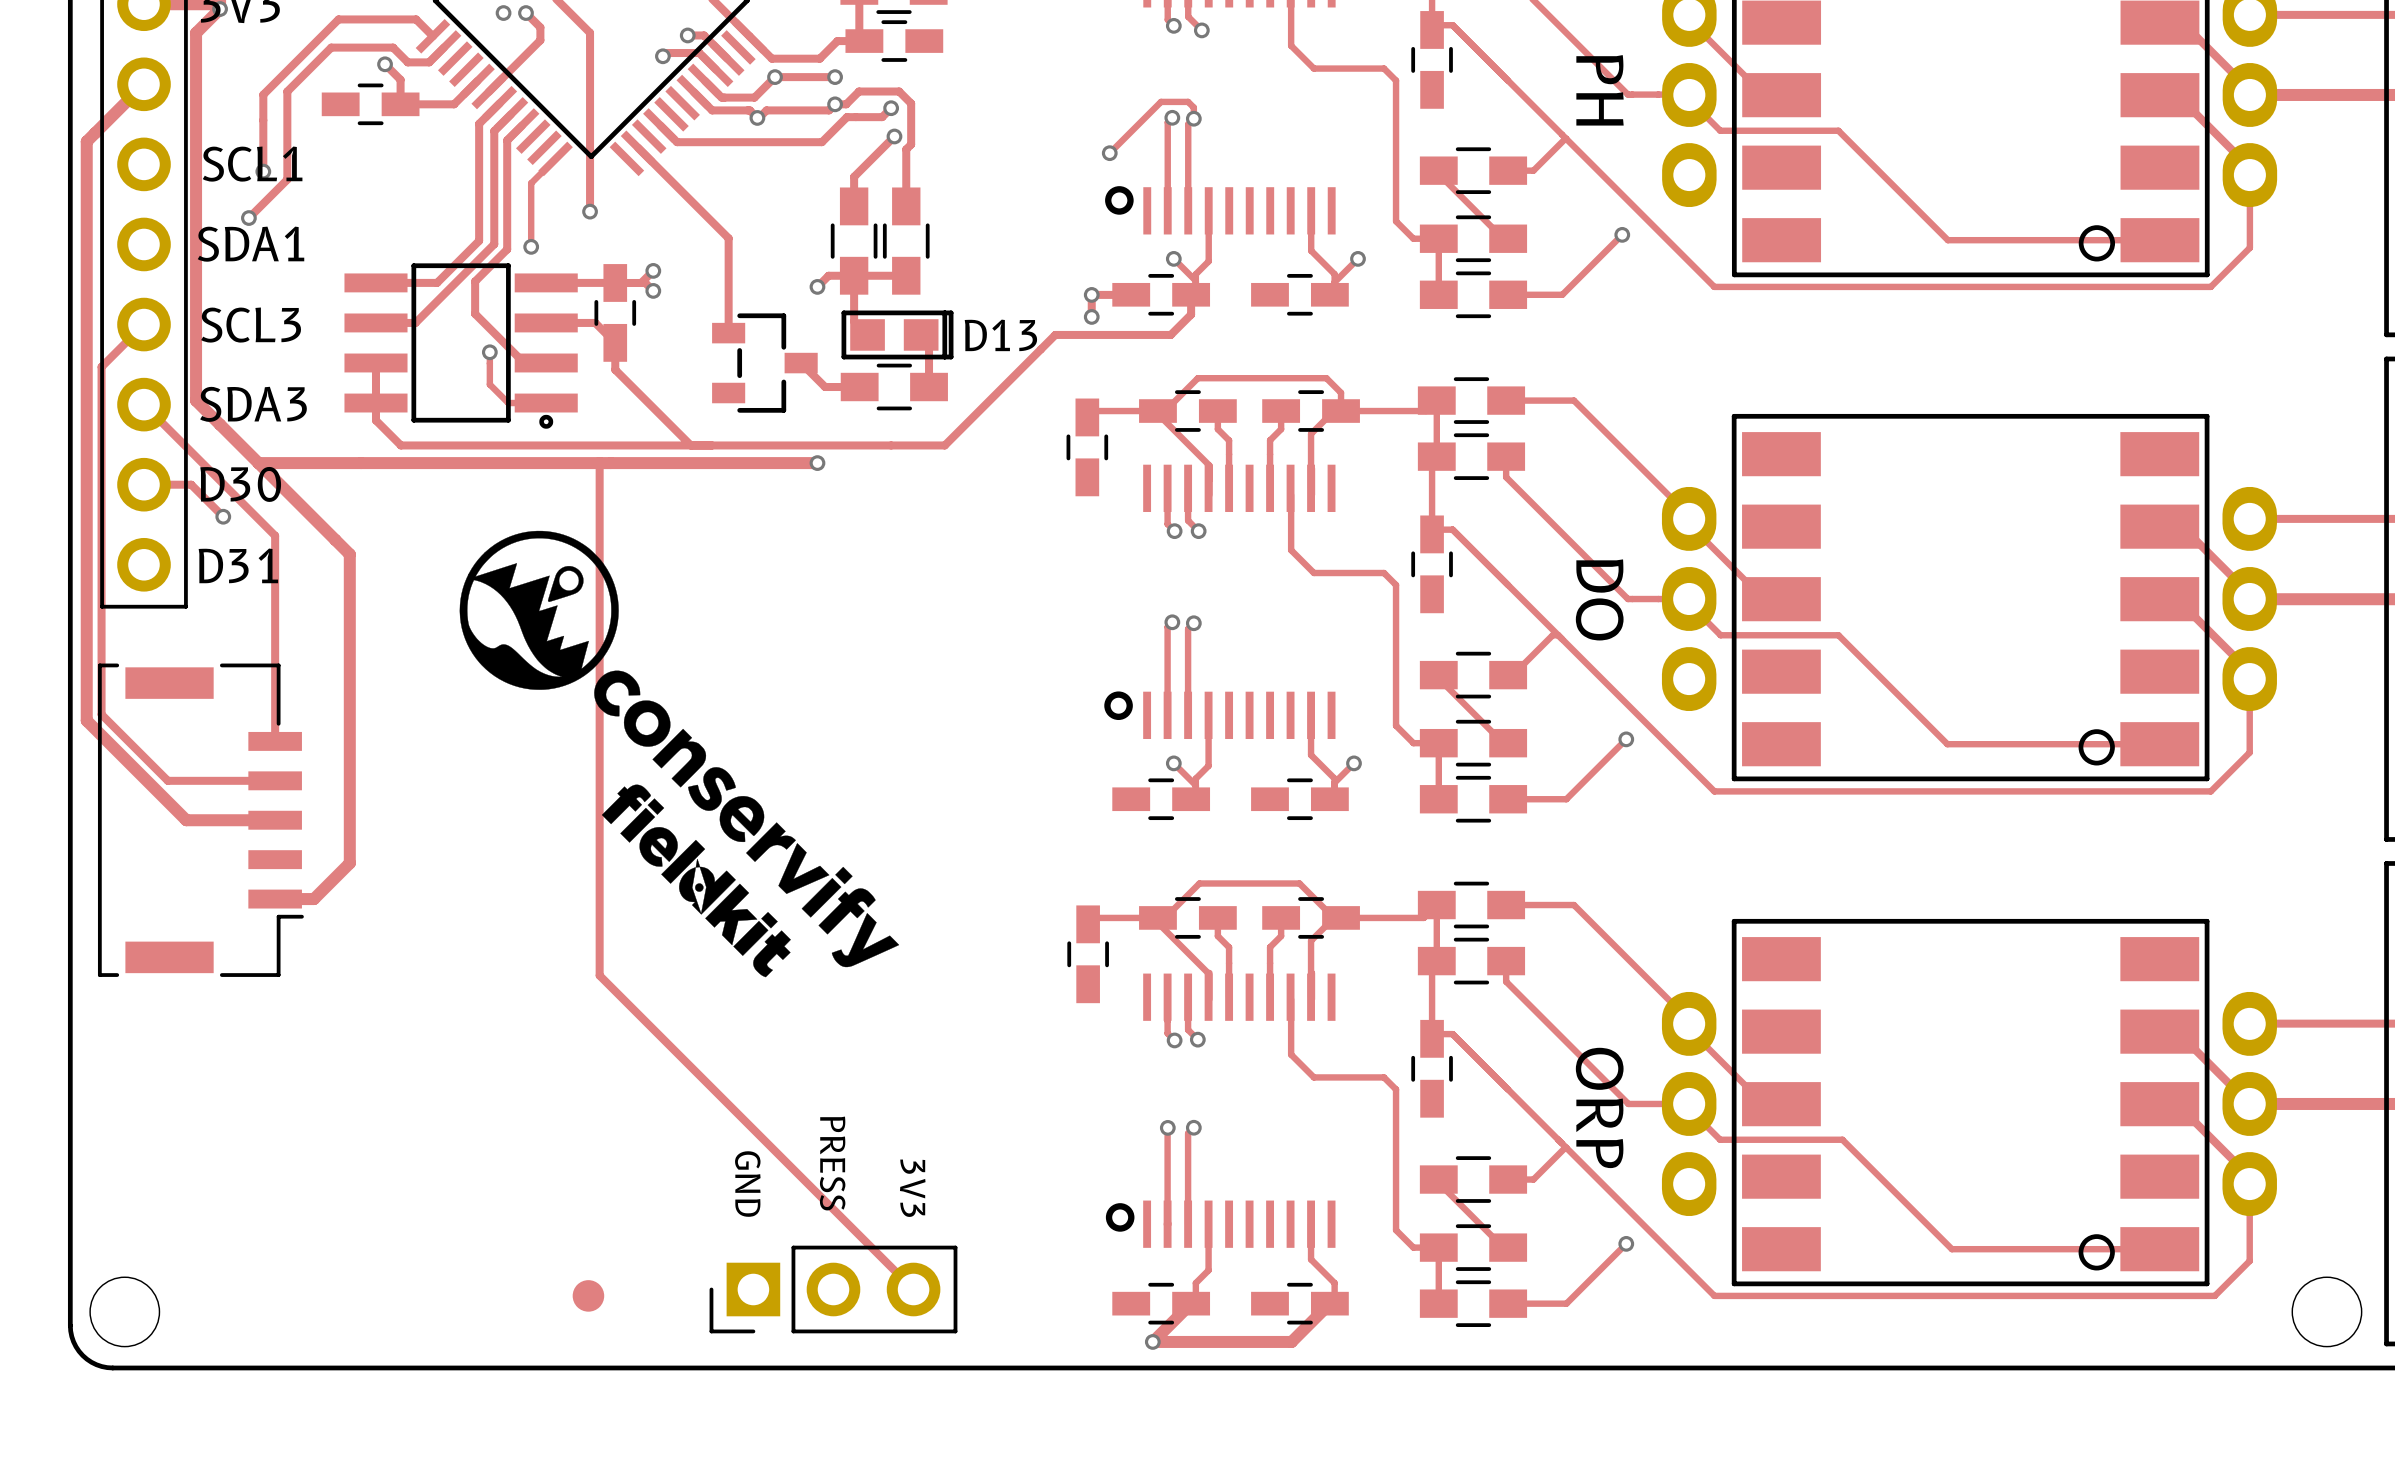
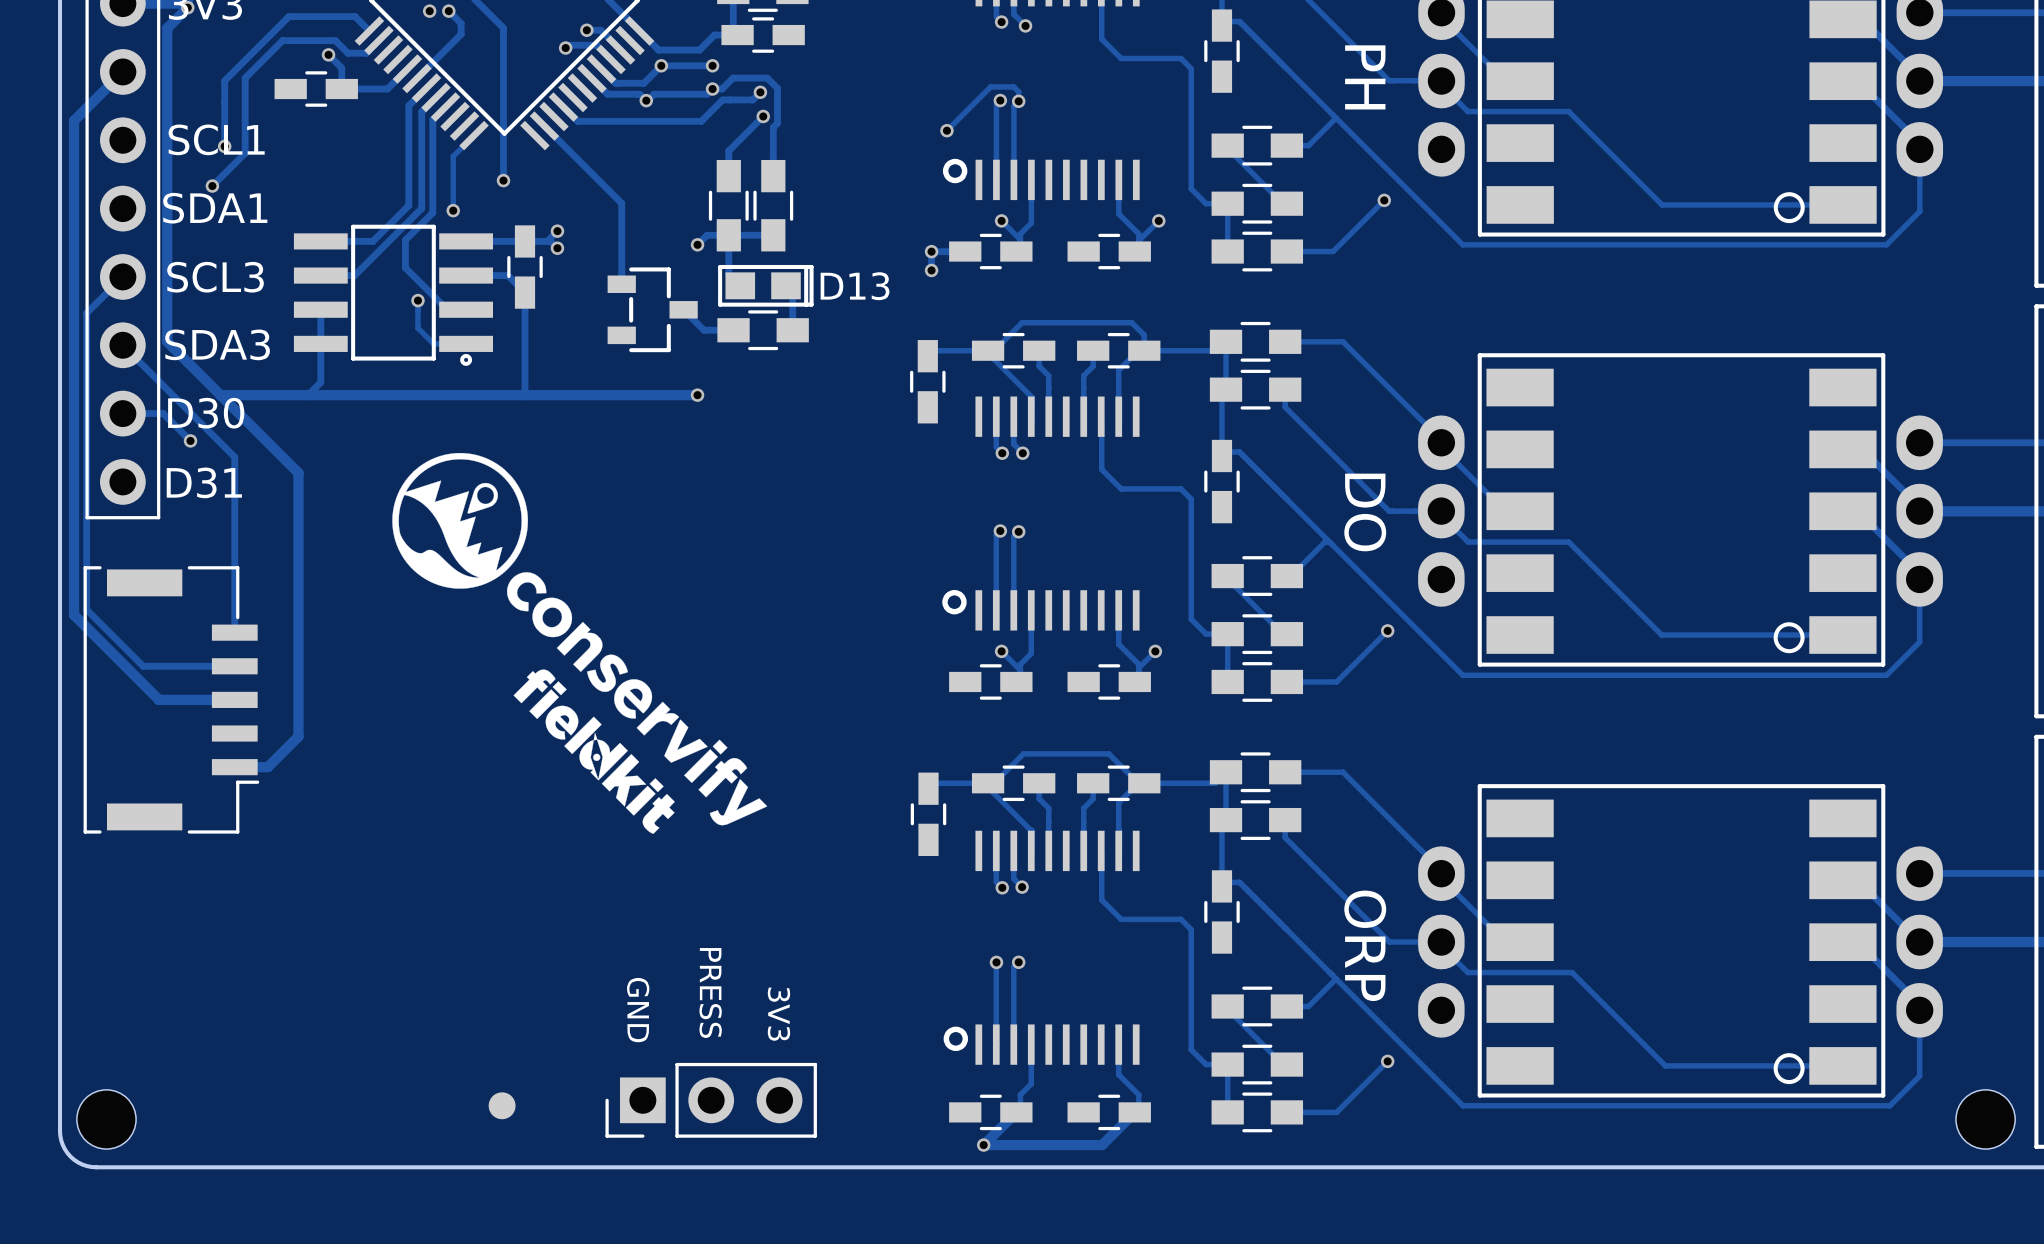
track: (1191, 294) (1191, 314) (1170, 334) (1055, 334) (944, 445) (400, 445) (375, 420) -> (308, 395) (320, 382) (320, 358)
track: (615, 369) (690, 445) -> (525, 315) (525, 391) (521, 395)
track: (599, 463) (599, 975) (913, 1289) -> none

